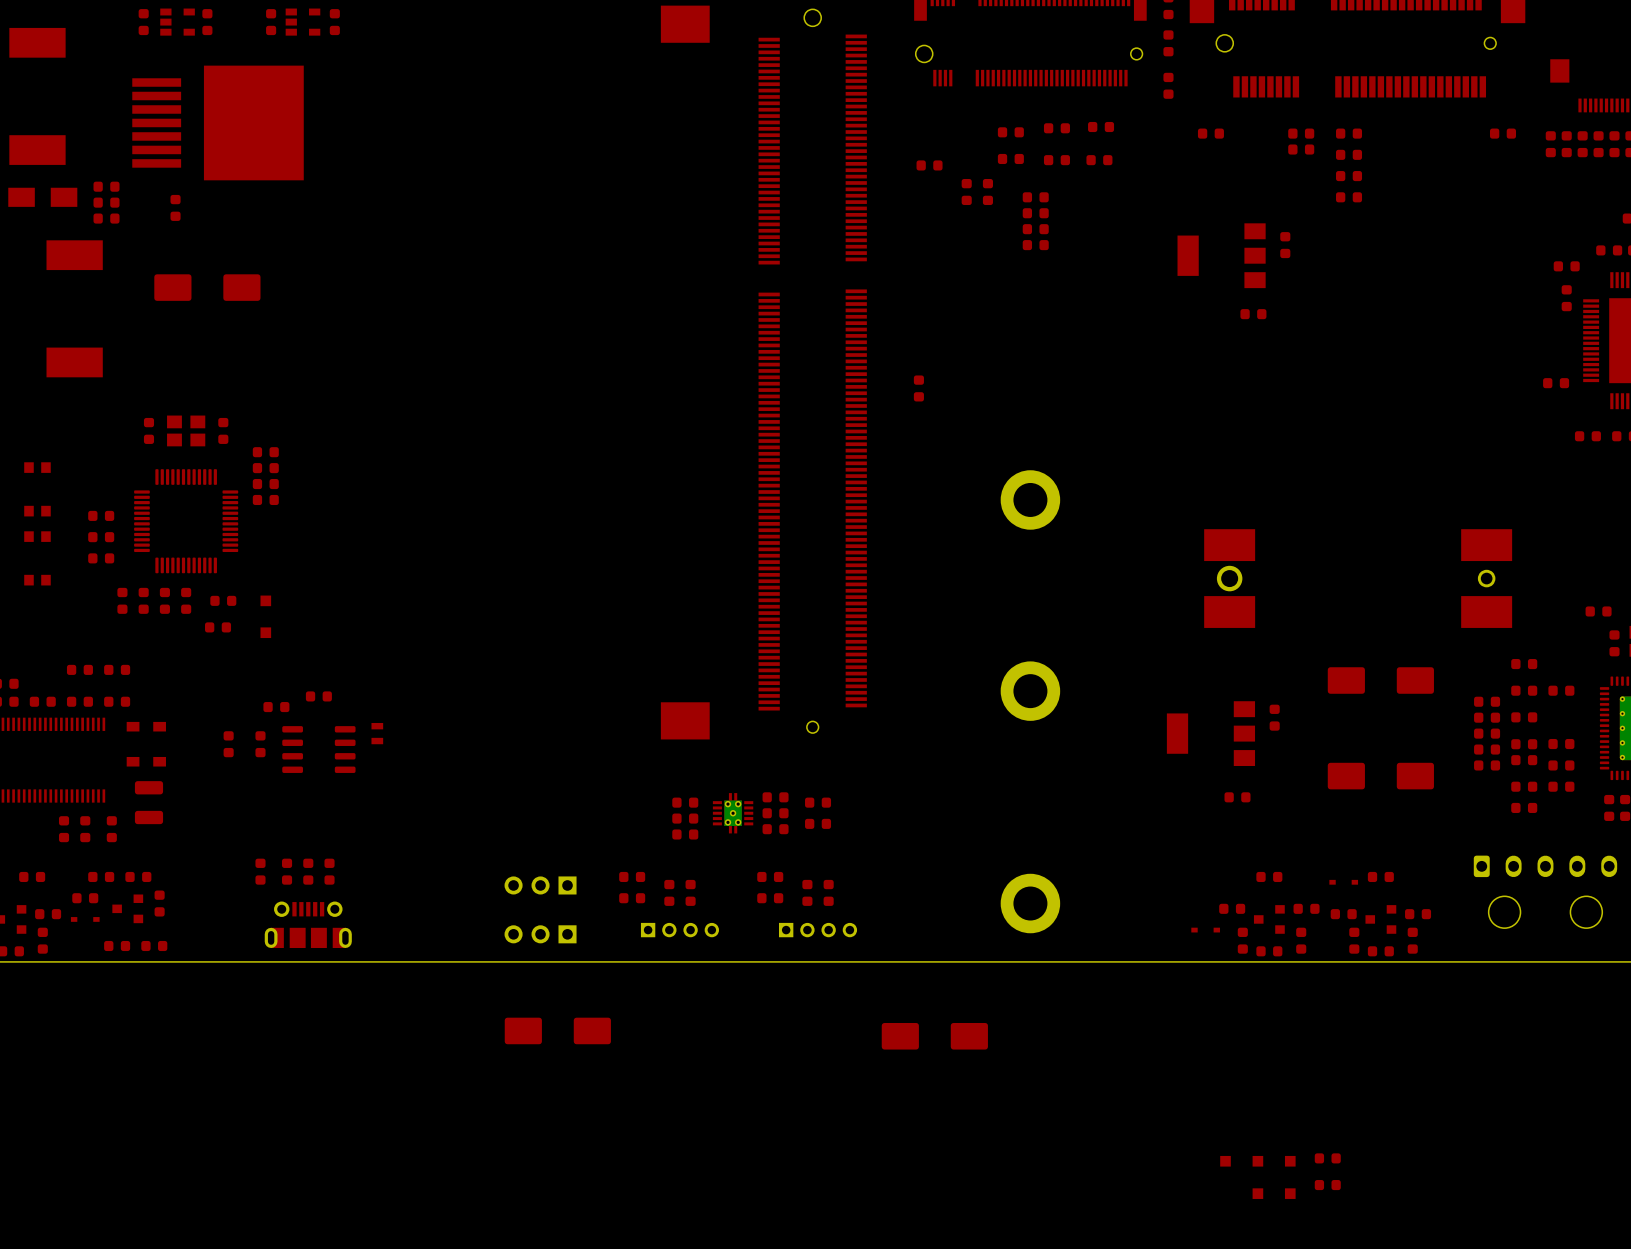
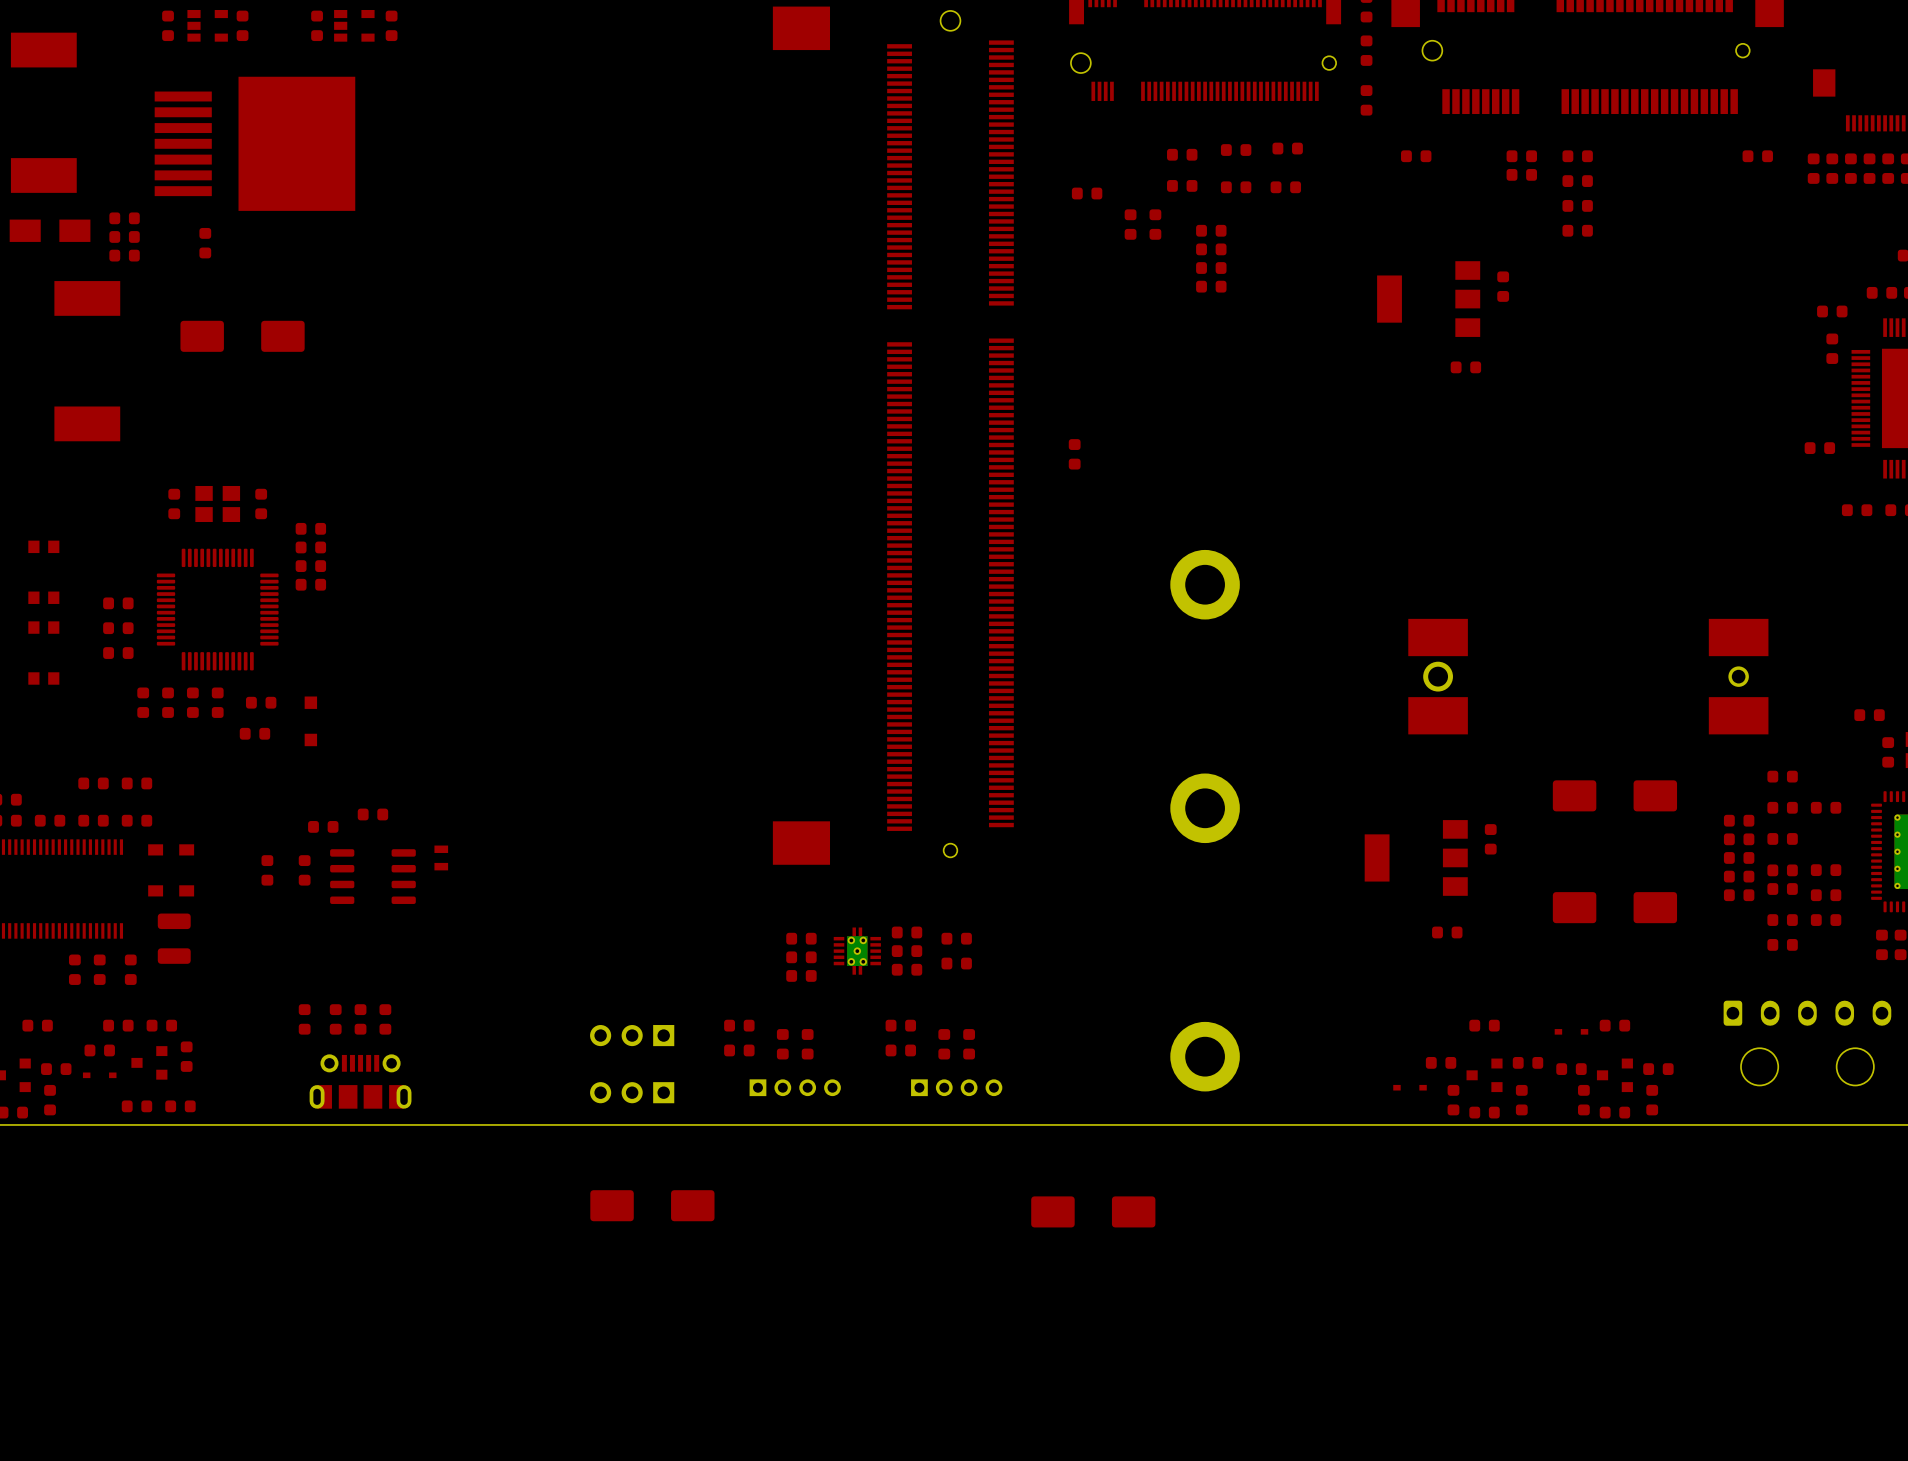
part: (1327, 1158) -> none
part: (1225, 1161) -> none
part: (1257, 1161) -> none
part: (1290, 1161) -> none
part: (1327, 1185) -> none
part: (1257, 1193) -> none
part: (1290, 1193) -> none

